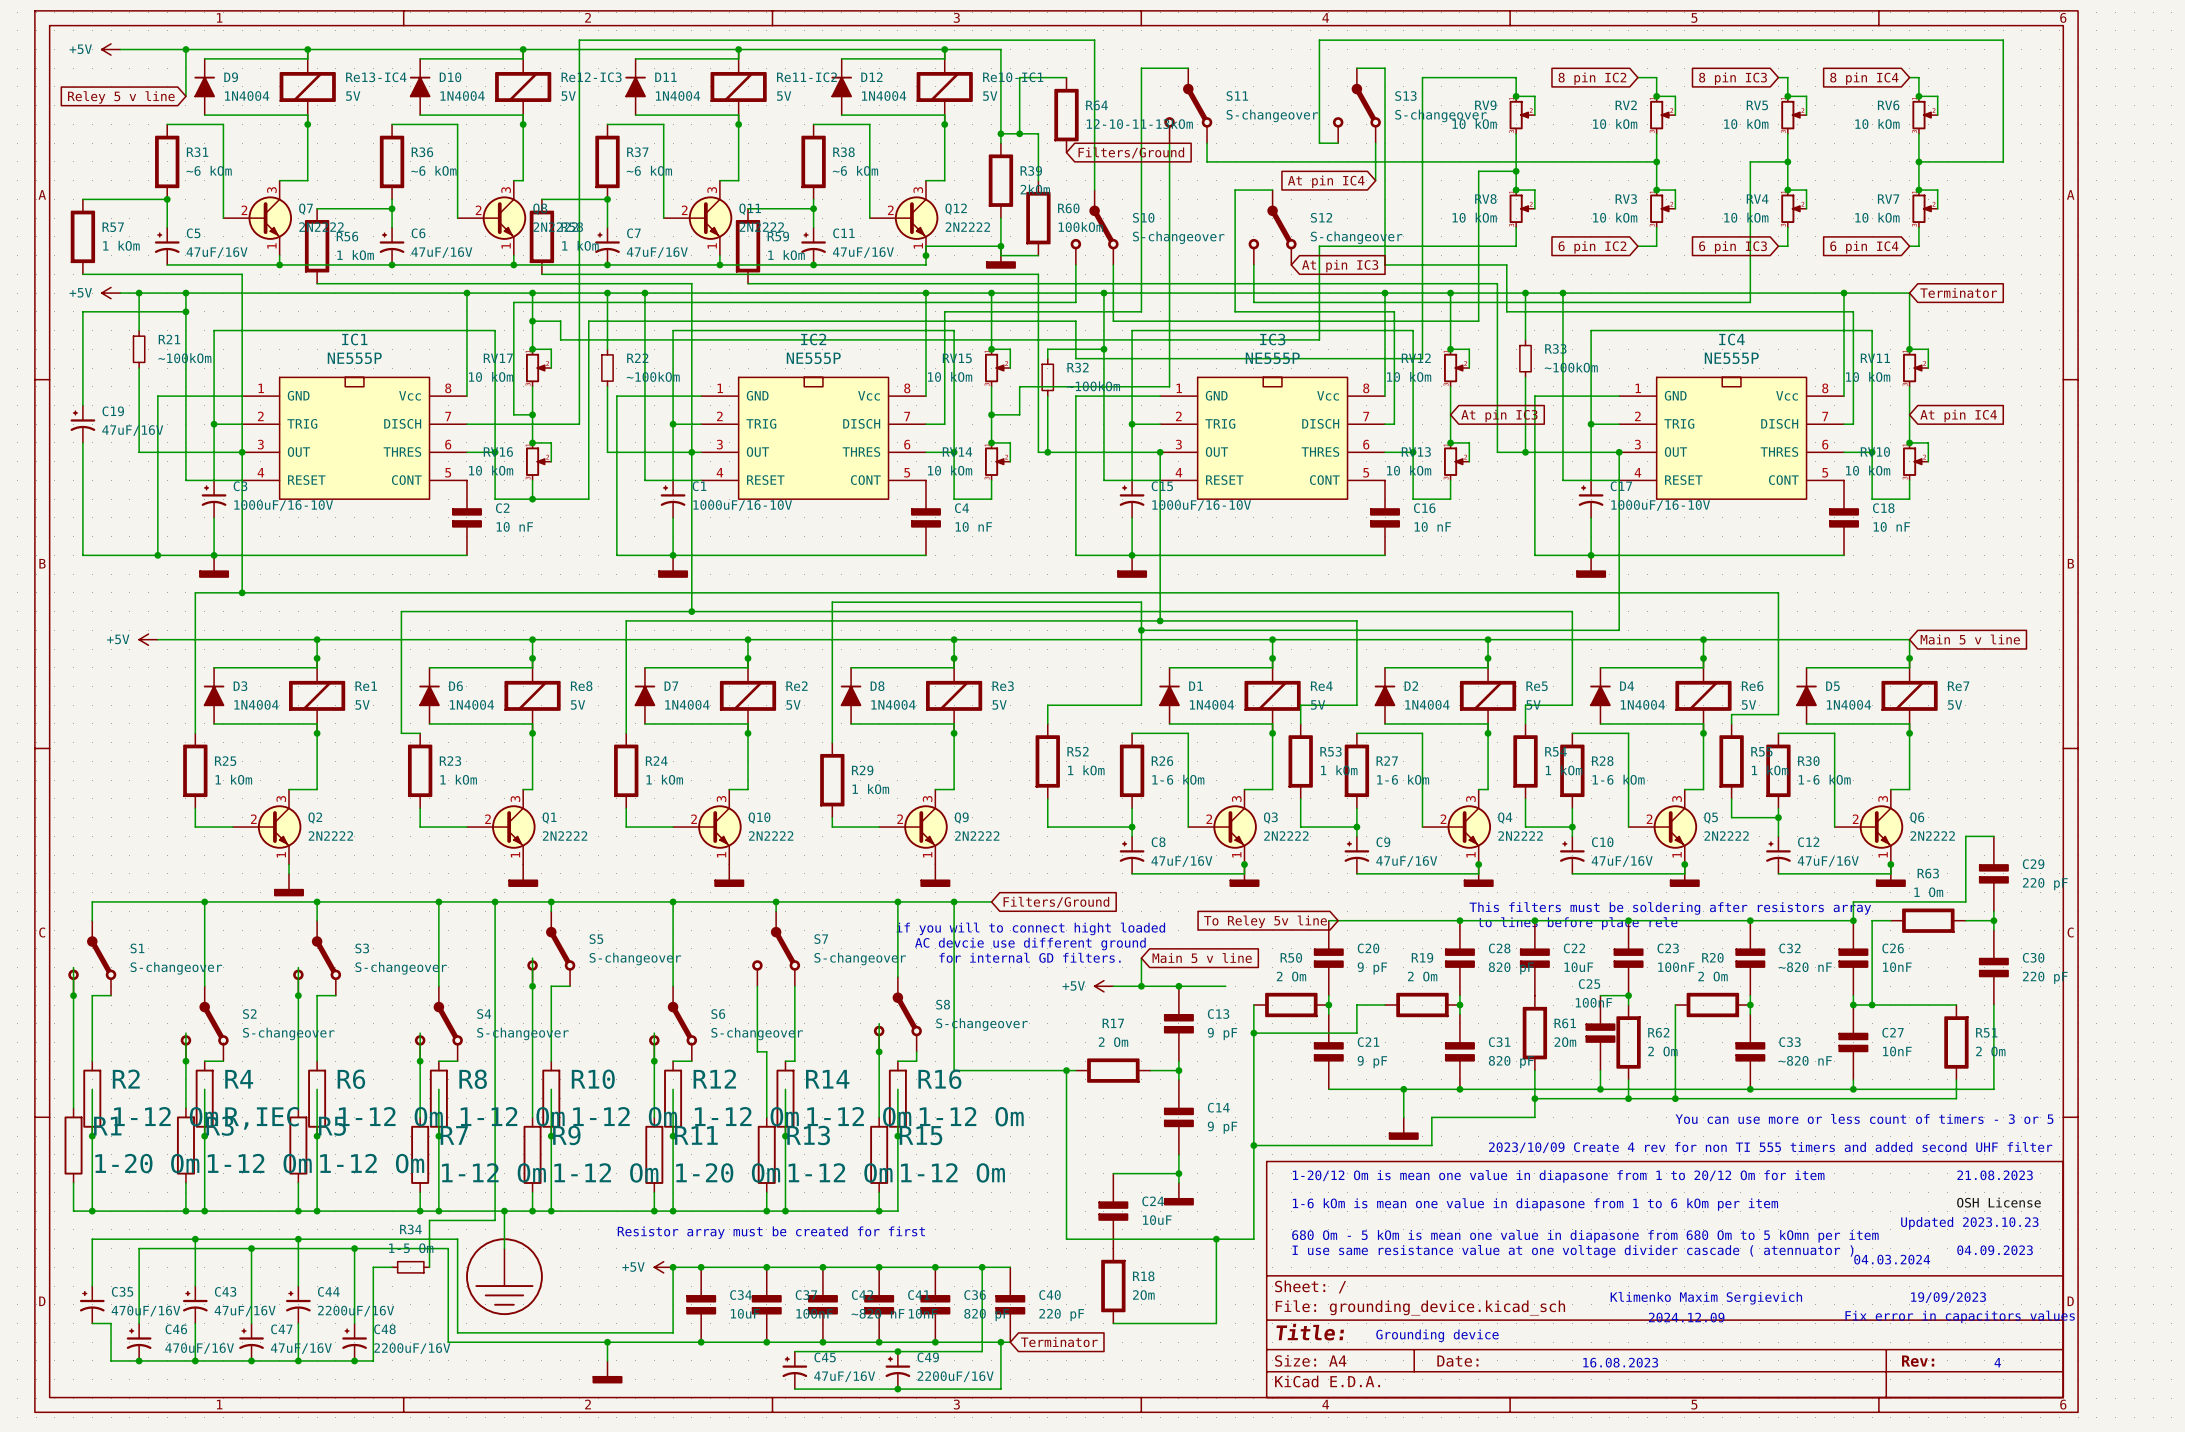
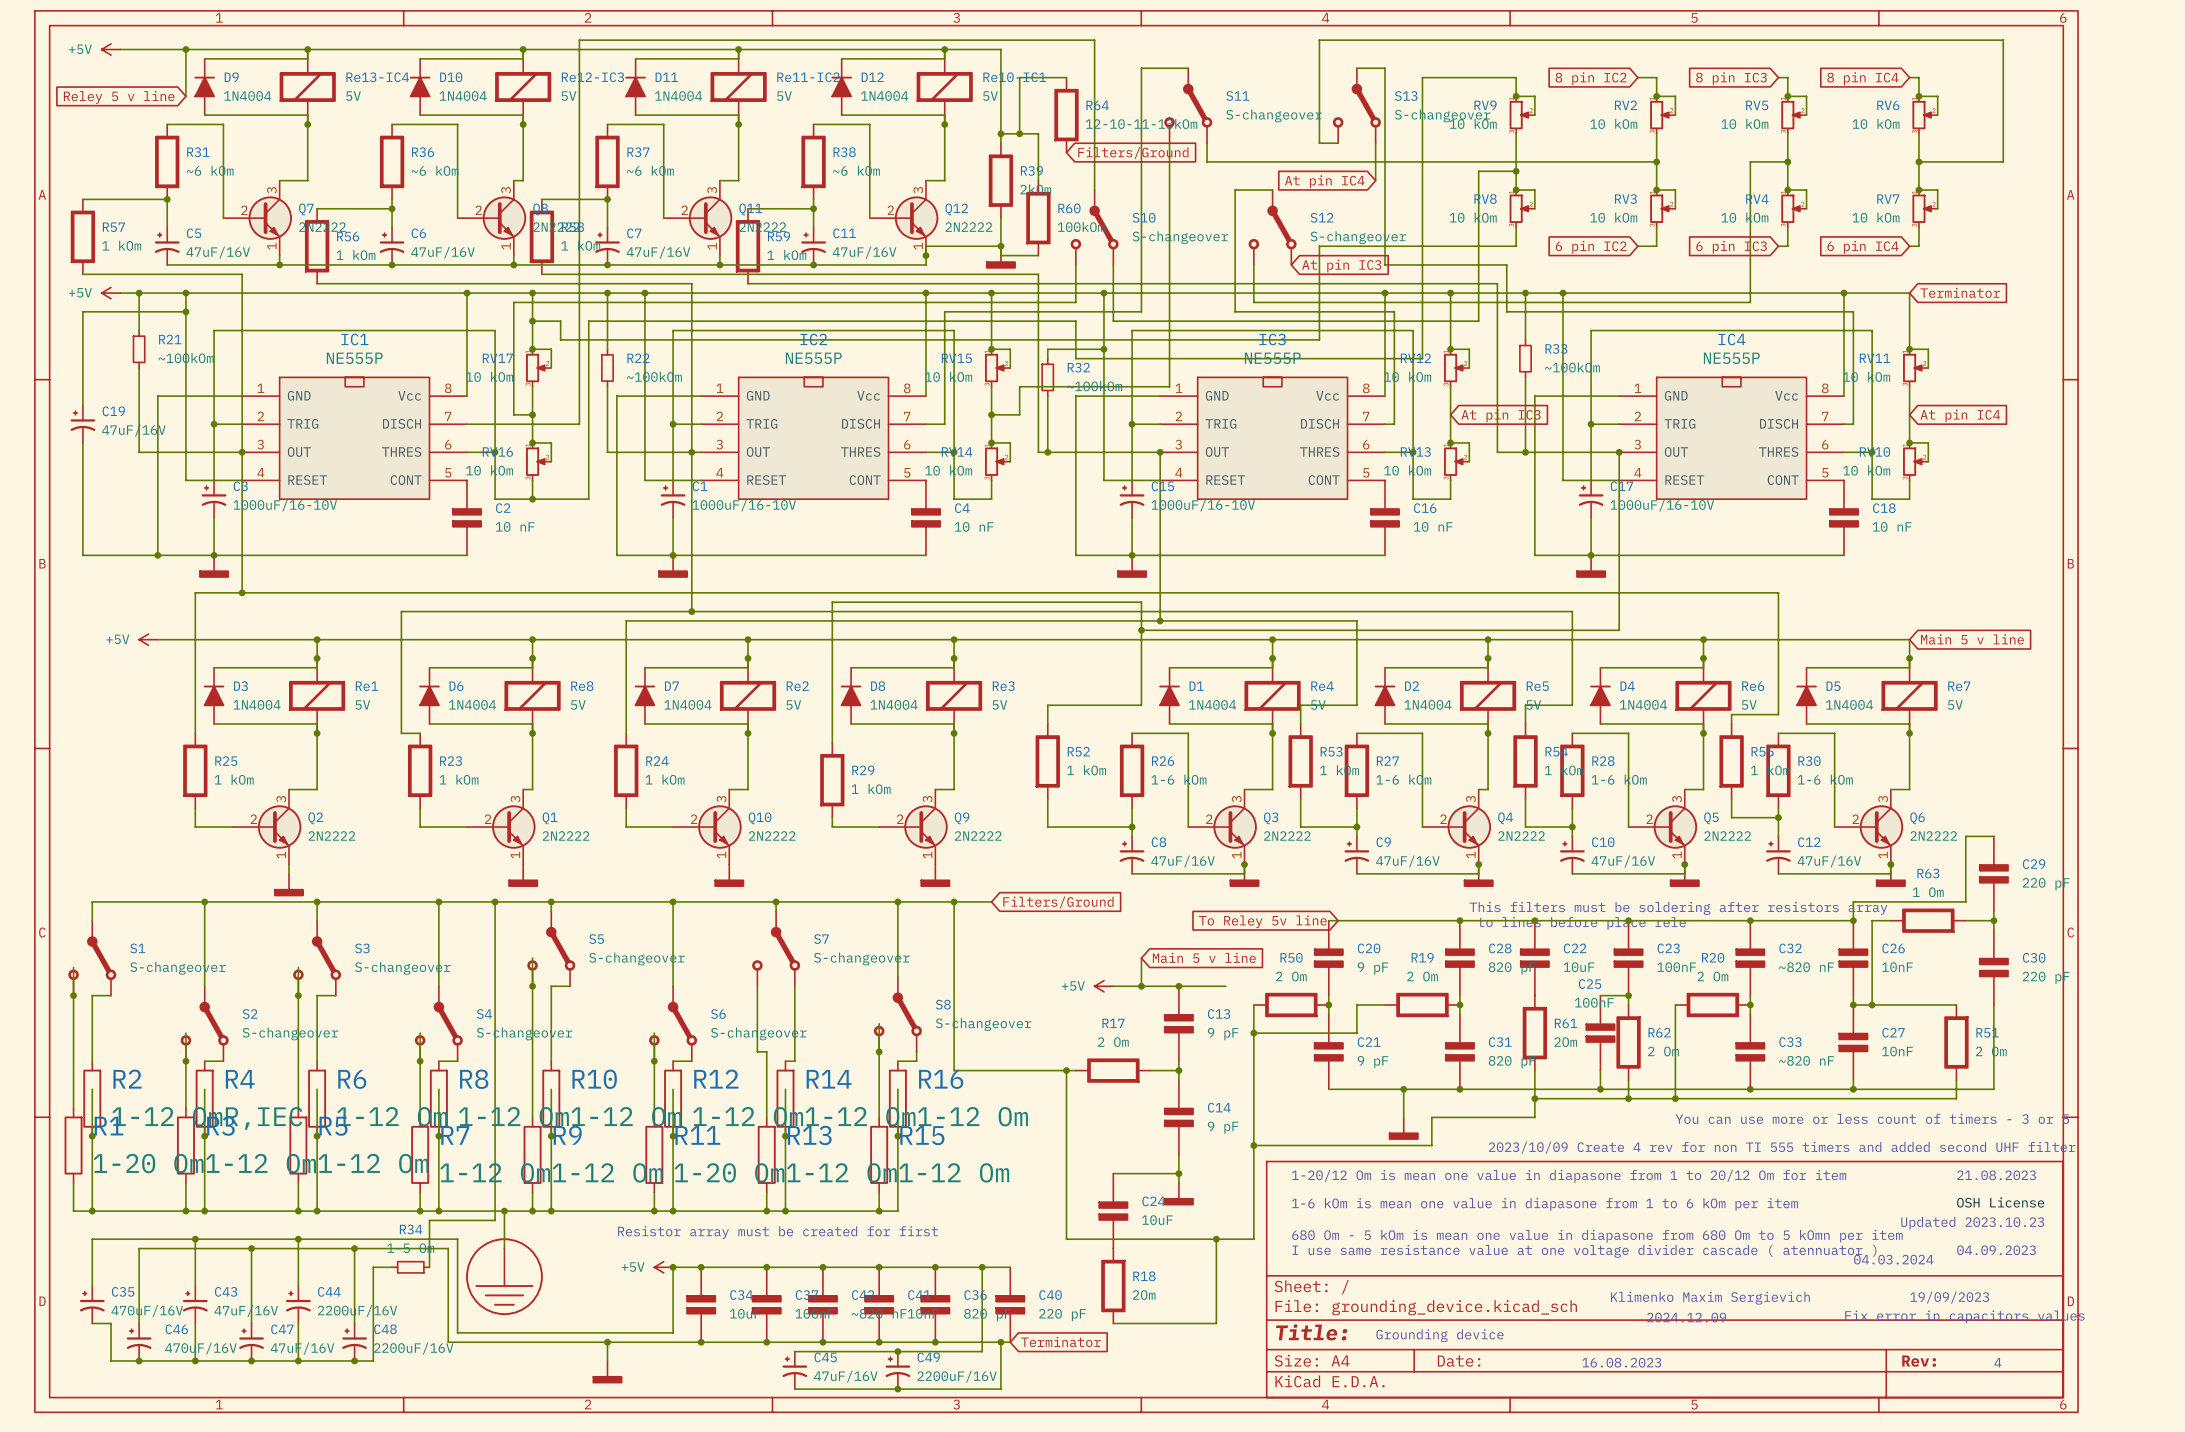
text: if you will to connect hight loaded (1030, 928) -> none
text: AC devcie use different ground (1030, 944) -> none
text: for internal GD filters. (1029, 957) -> none

